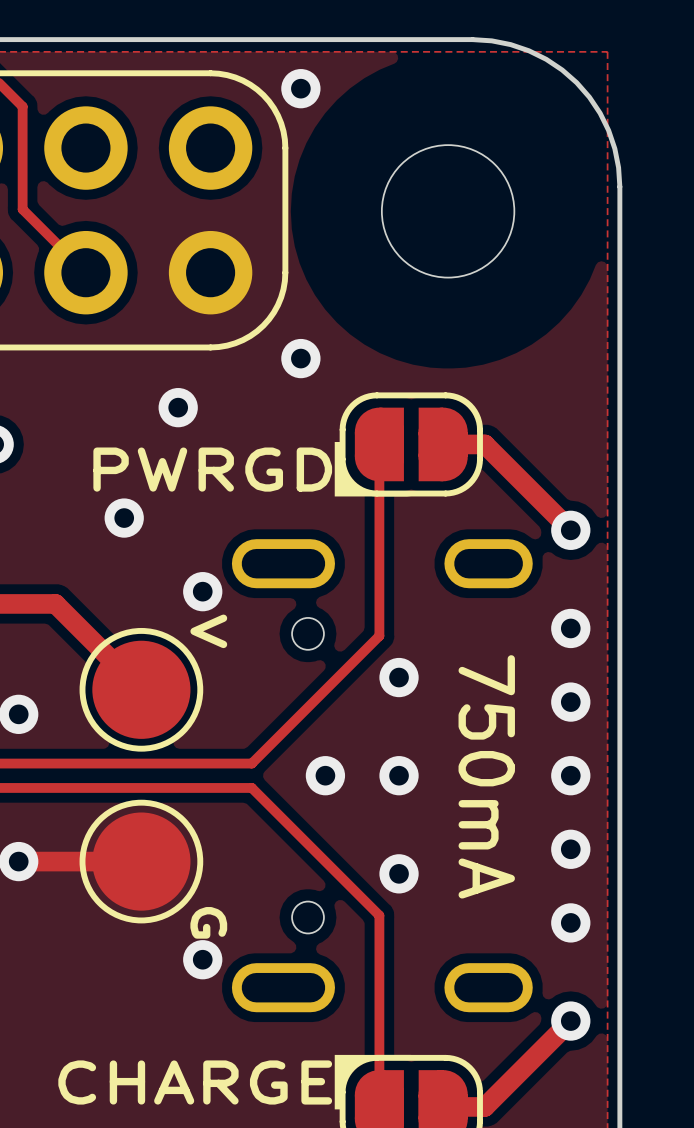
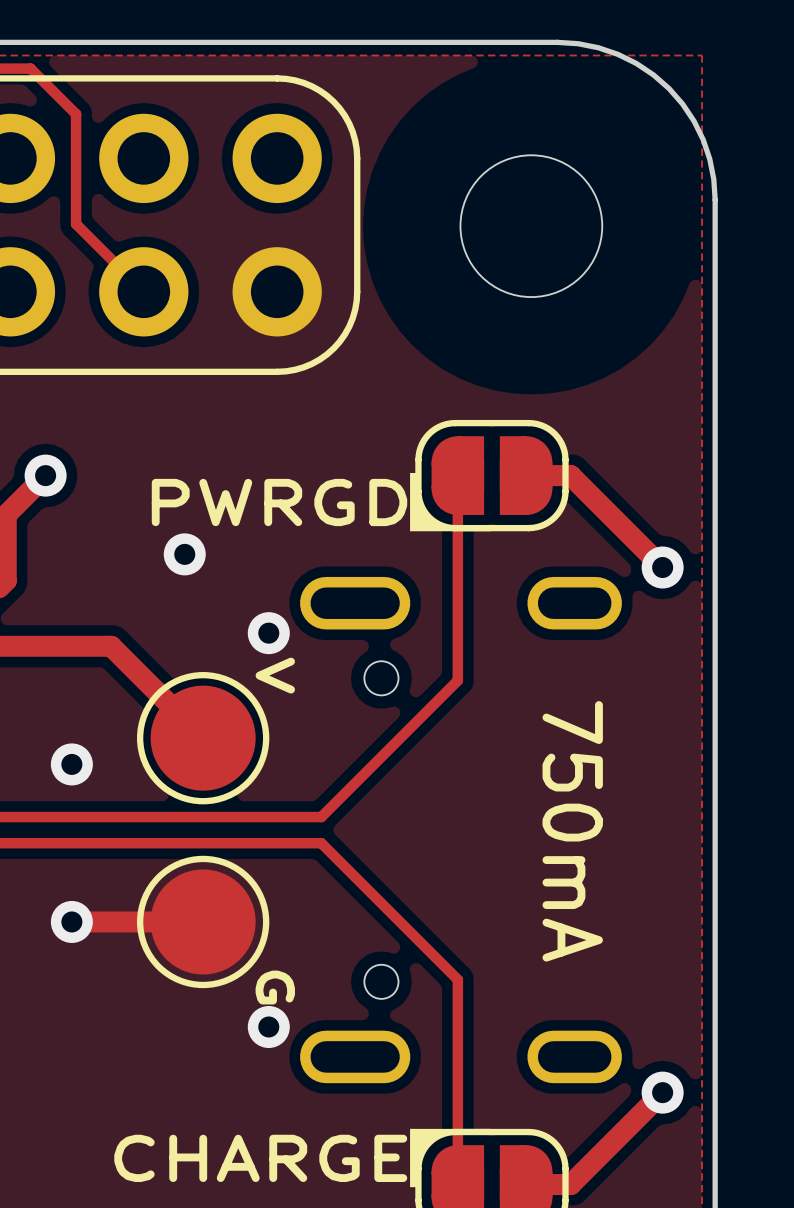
via: (300, 88) -> none
via: (300, 358) -> none
via: (178, 407) -> none
via: (570, 628) -> none
via: (399, 677) -> none
via: (570, 702) -> none
via: (325, 775) -> none
via: (399, 775) -> none
via: (570, 775) -> none
via: (570, 849) -> none
via: (399, 873) -> none
via: (570, 922) -> none

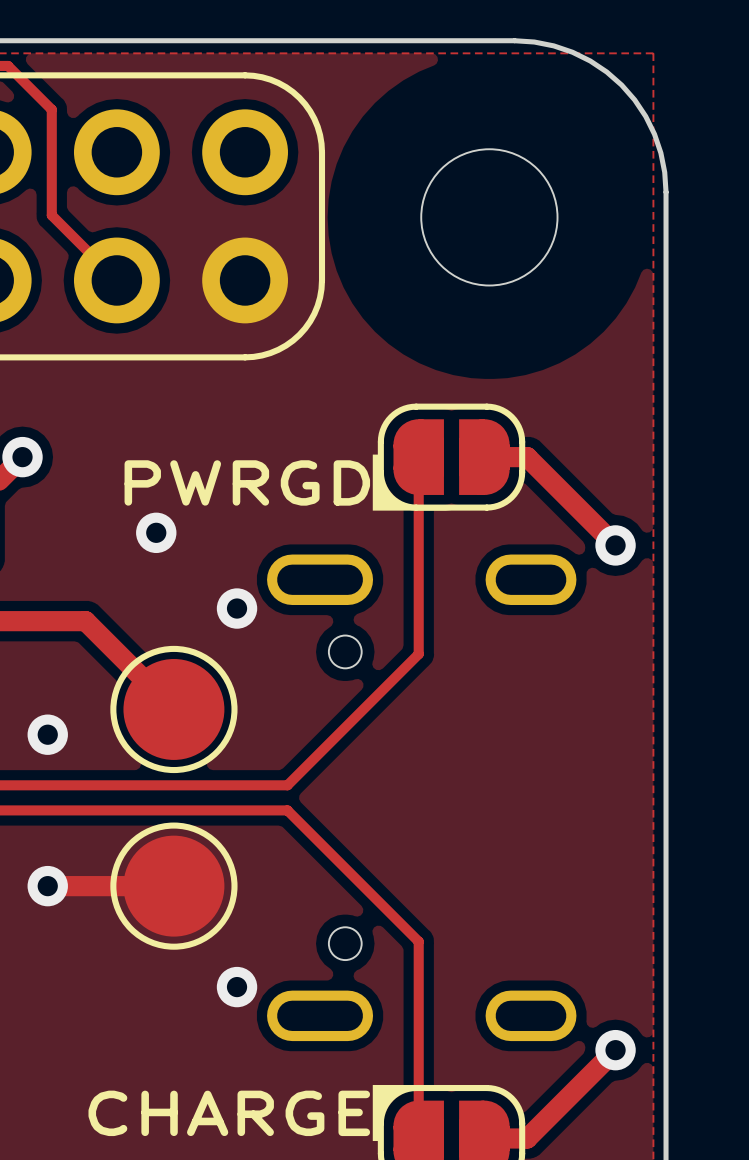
text: V (275, 675) -> none
text: 750mA (572, 831) -> none
text: G (275, 987) -> none

